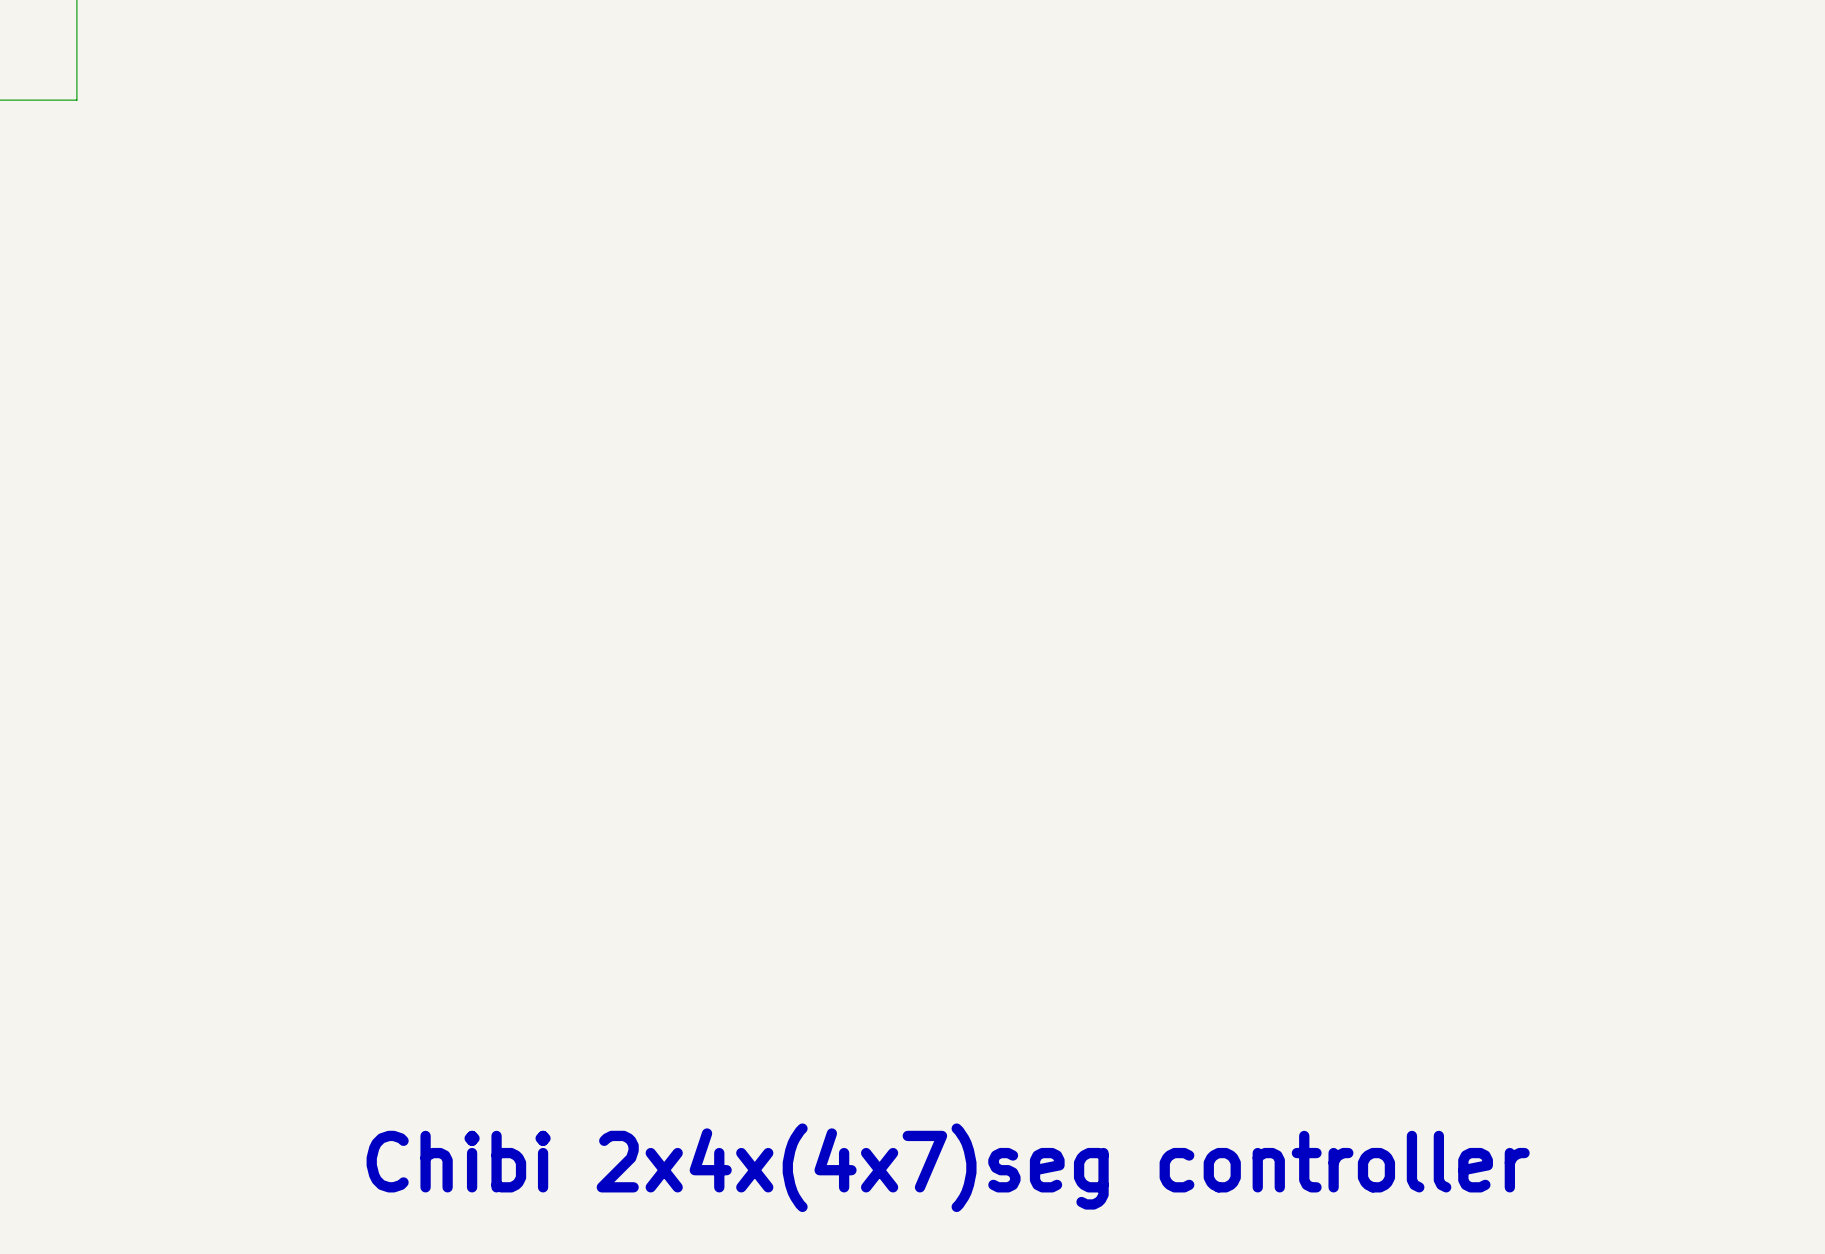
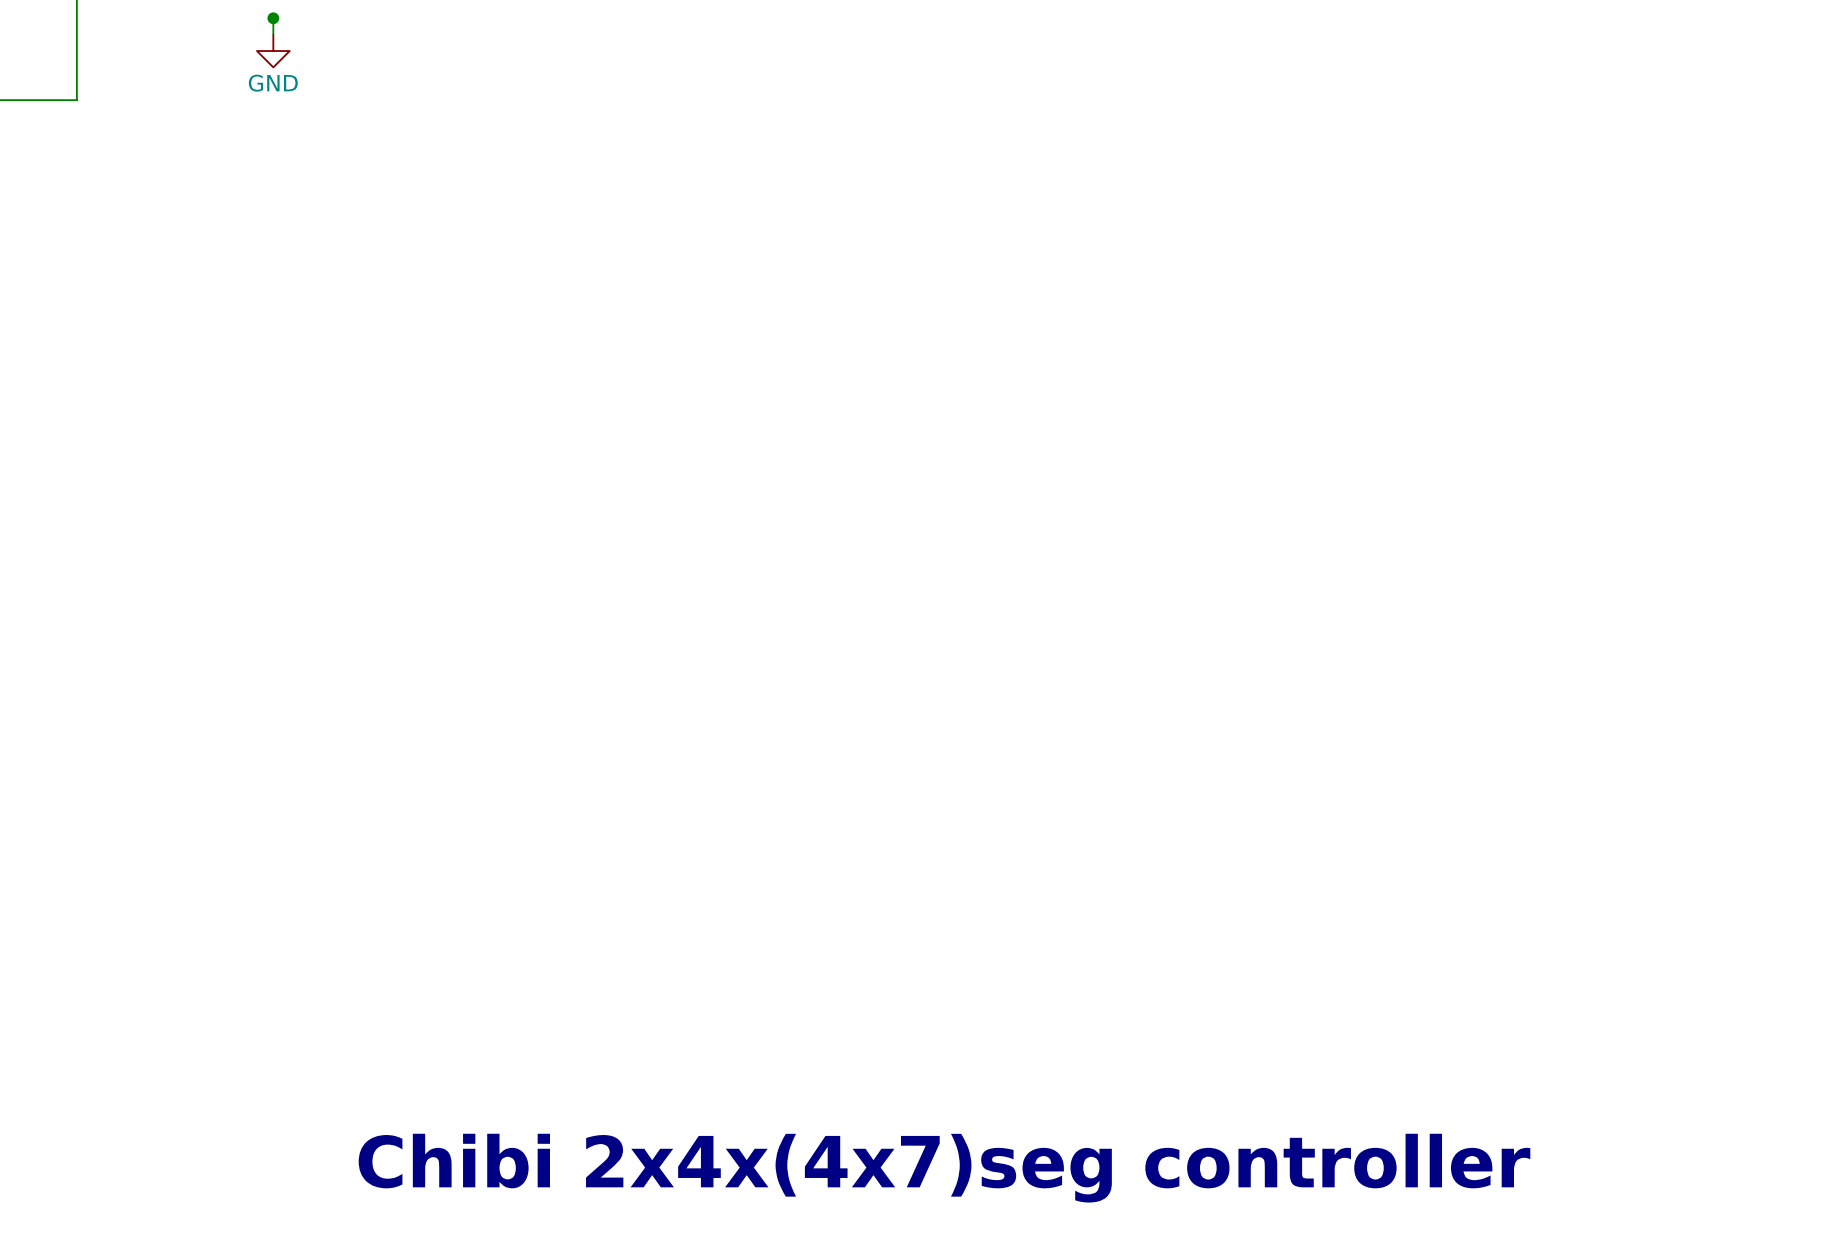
wire: none -> (273, 18) (273, 34)
junction: none -> (273, 18)
power symbol: none -> GND (273, 51)

